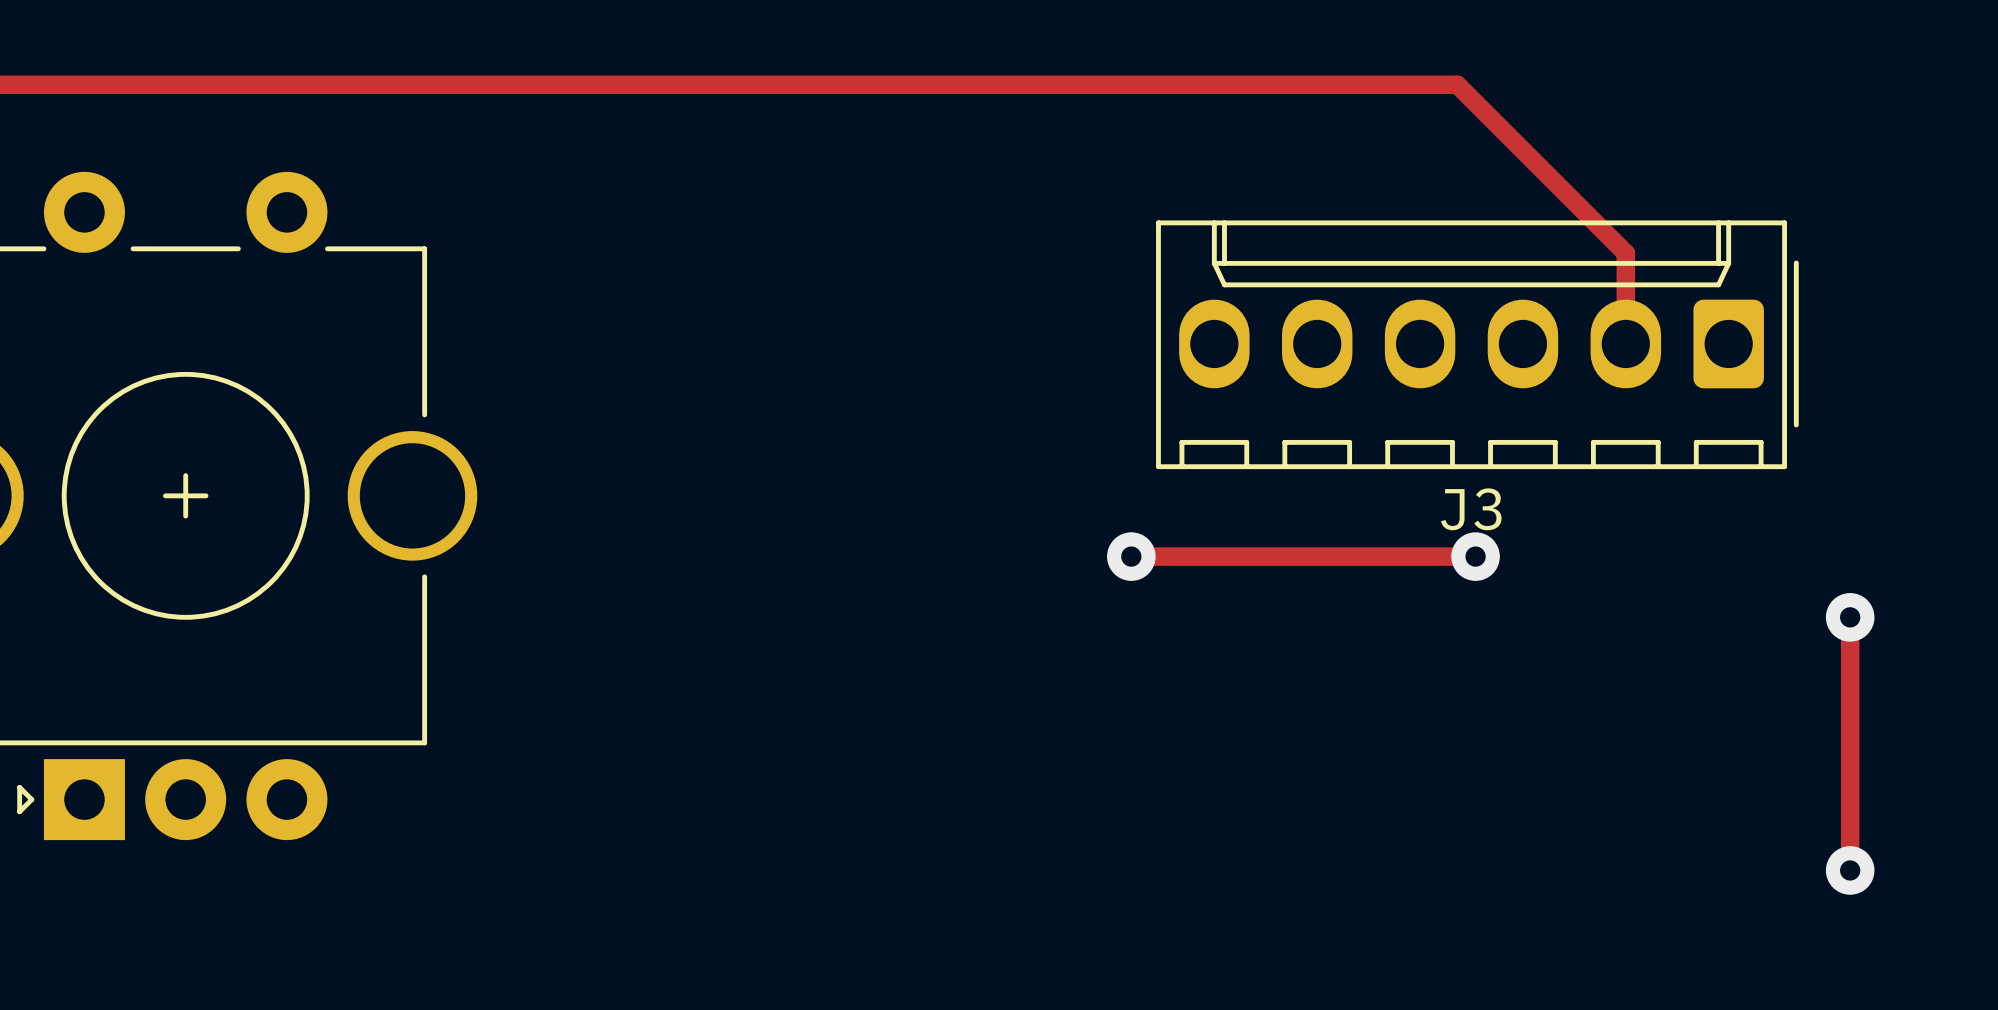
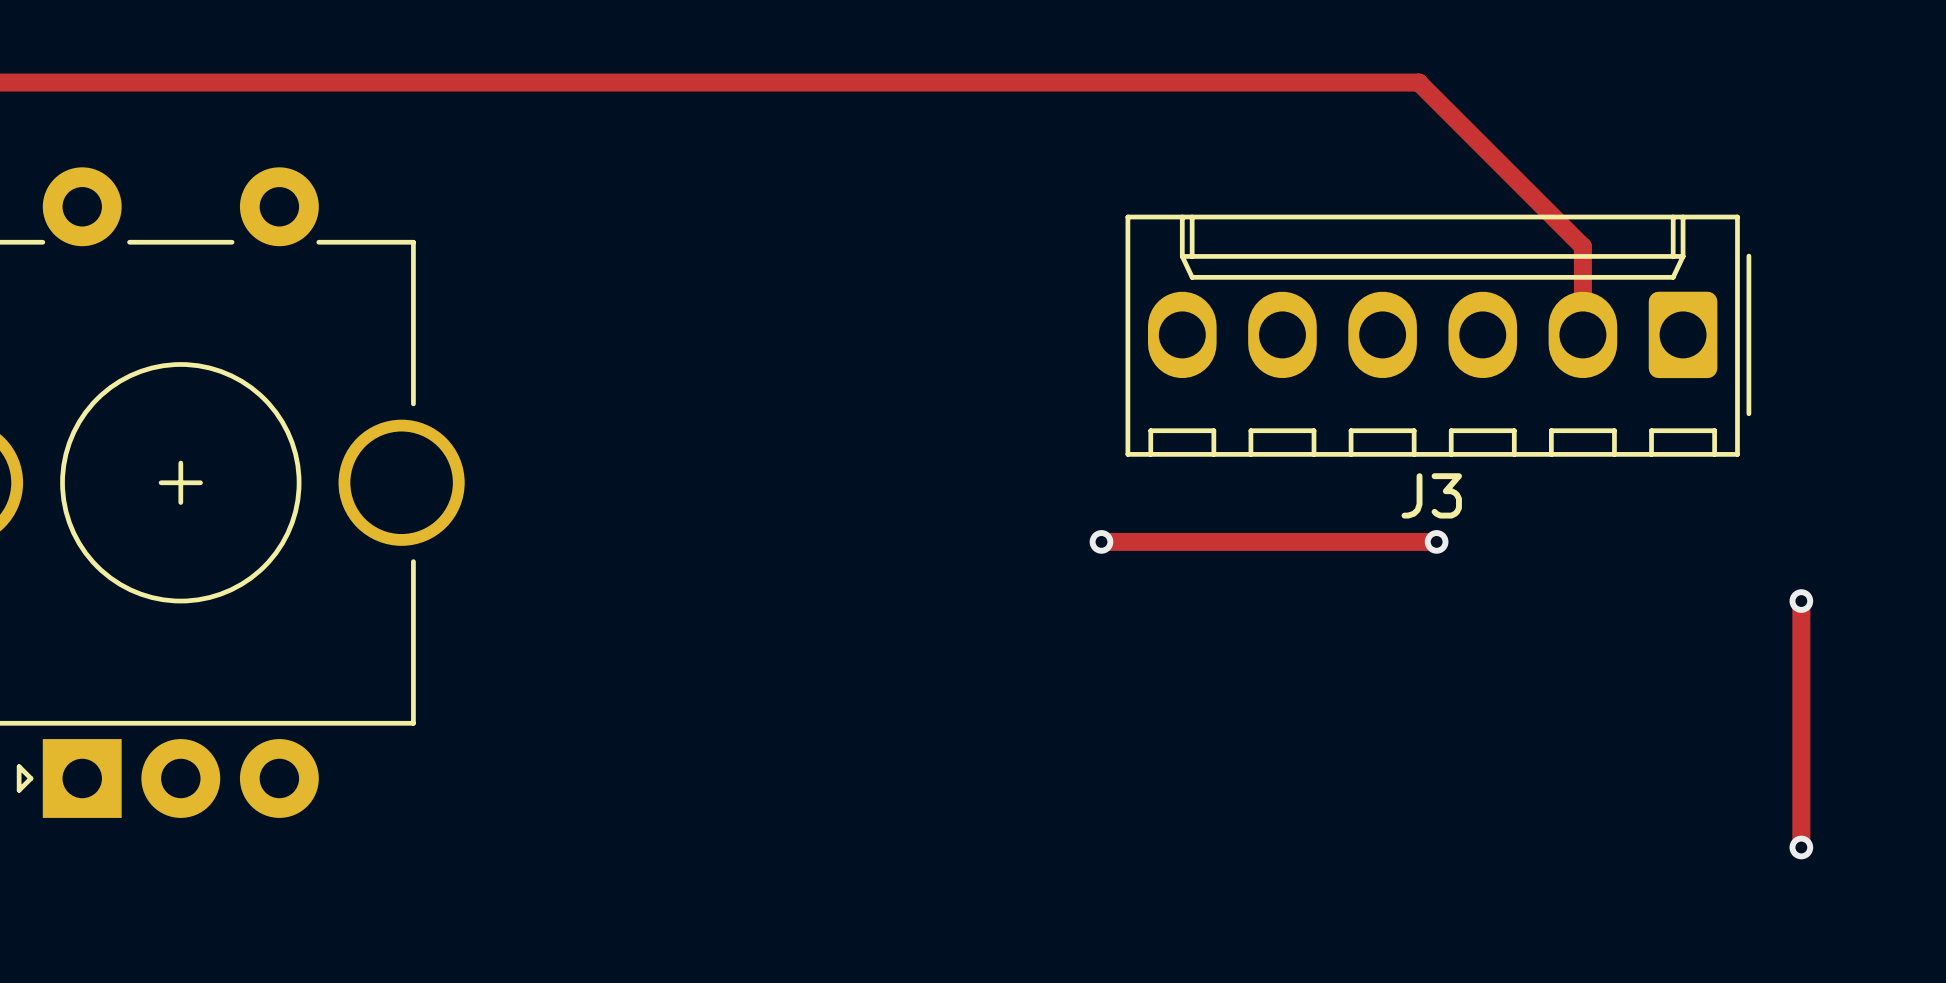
via size: [1107, 532, 1156, 581] -> [1089, 530, 1114, 554]
via size: [1451, 532, 1500, 581] -> [1424, 530, 1449, 554]
via size: [1825, 593, 1875, 642] -> [1789, 589, 1814, 613]
via size: [1825, 846, 1875, 895] -> [1789, 835, 1814, 860]

